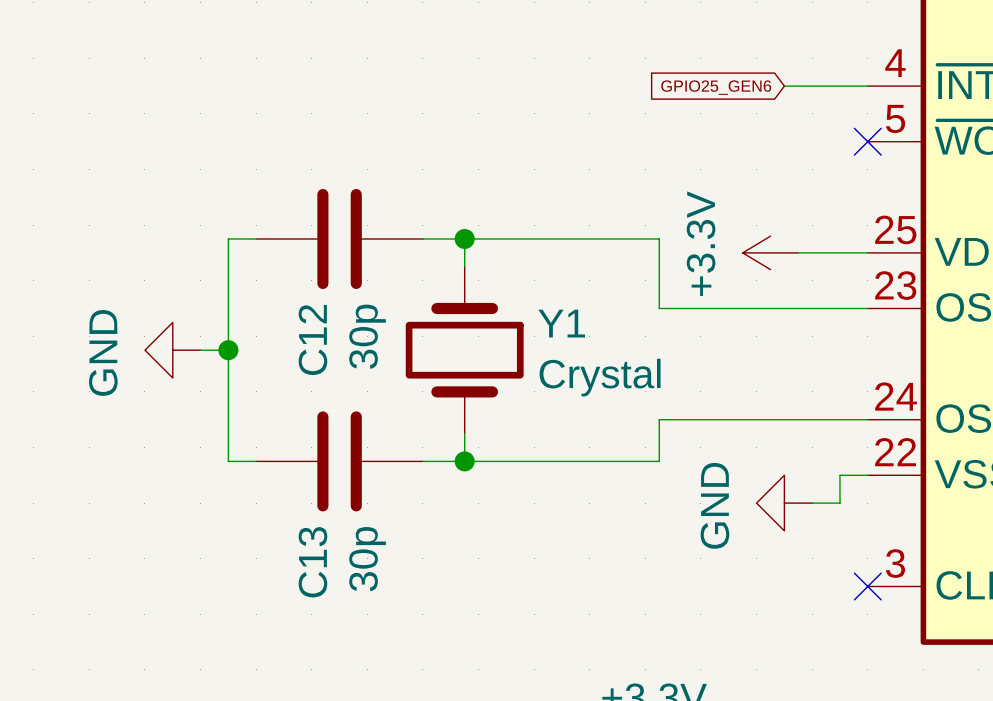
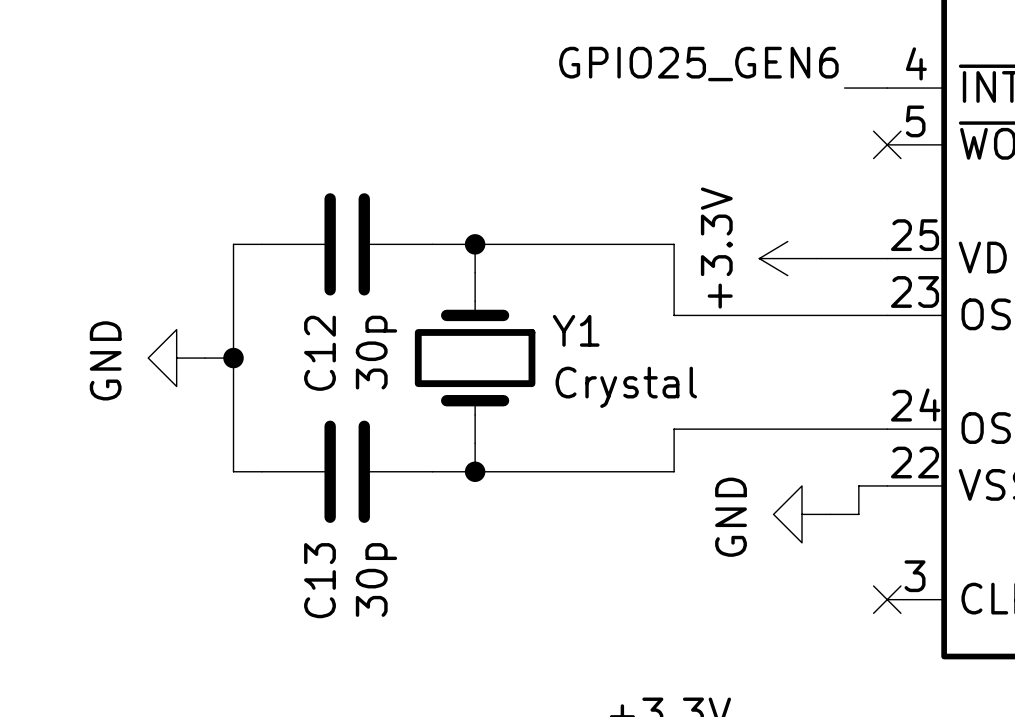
label: none -> GPIO25_GEN6 (698, 64)
wire: (784, 86) (826, 86) -> none
global label: GPIO25_GEN6 (716, 87) -> none

